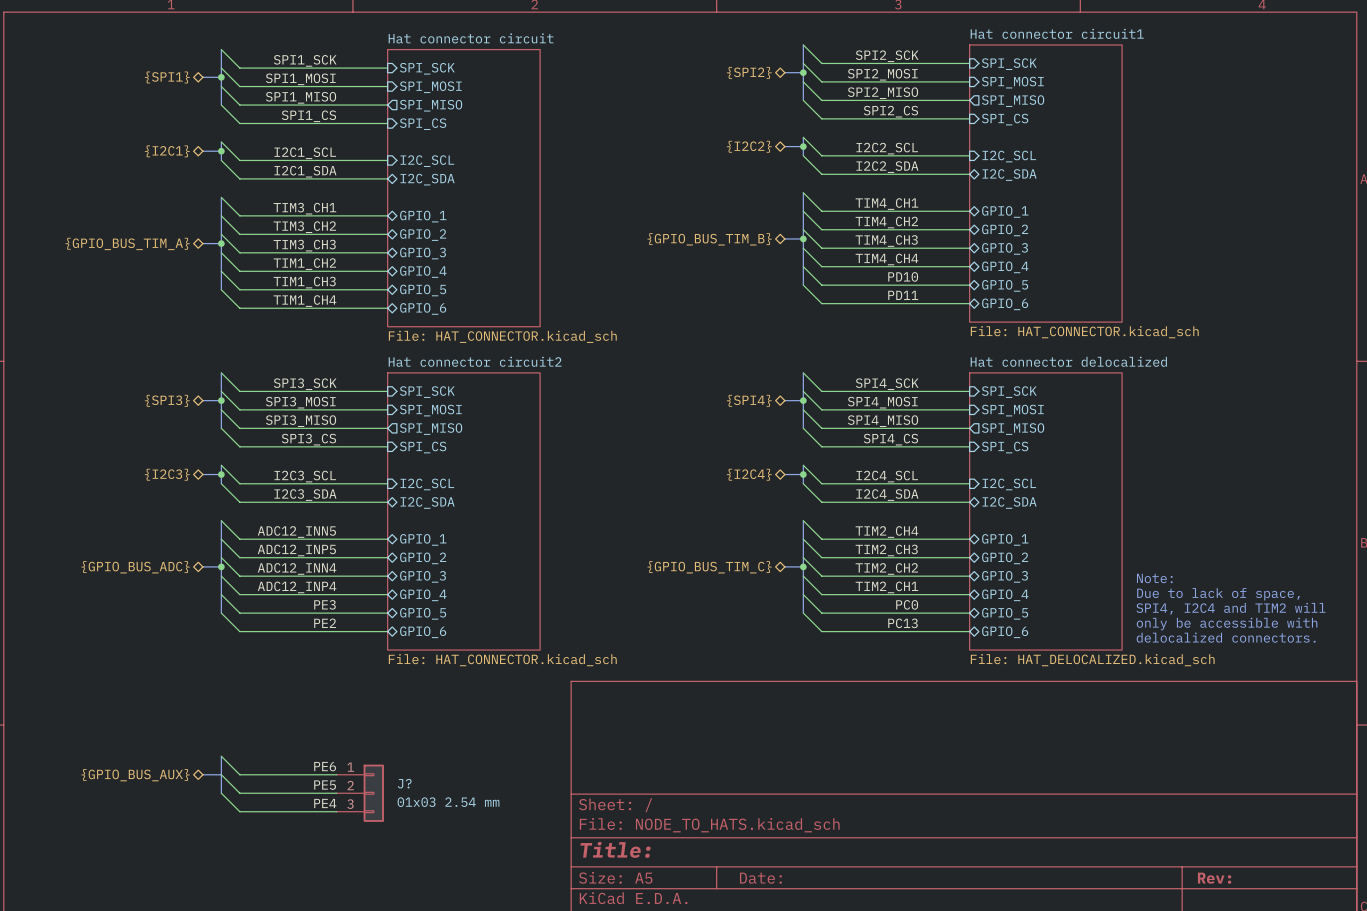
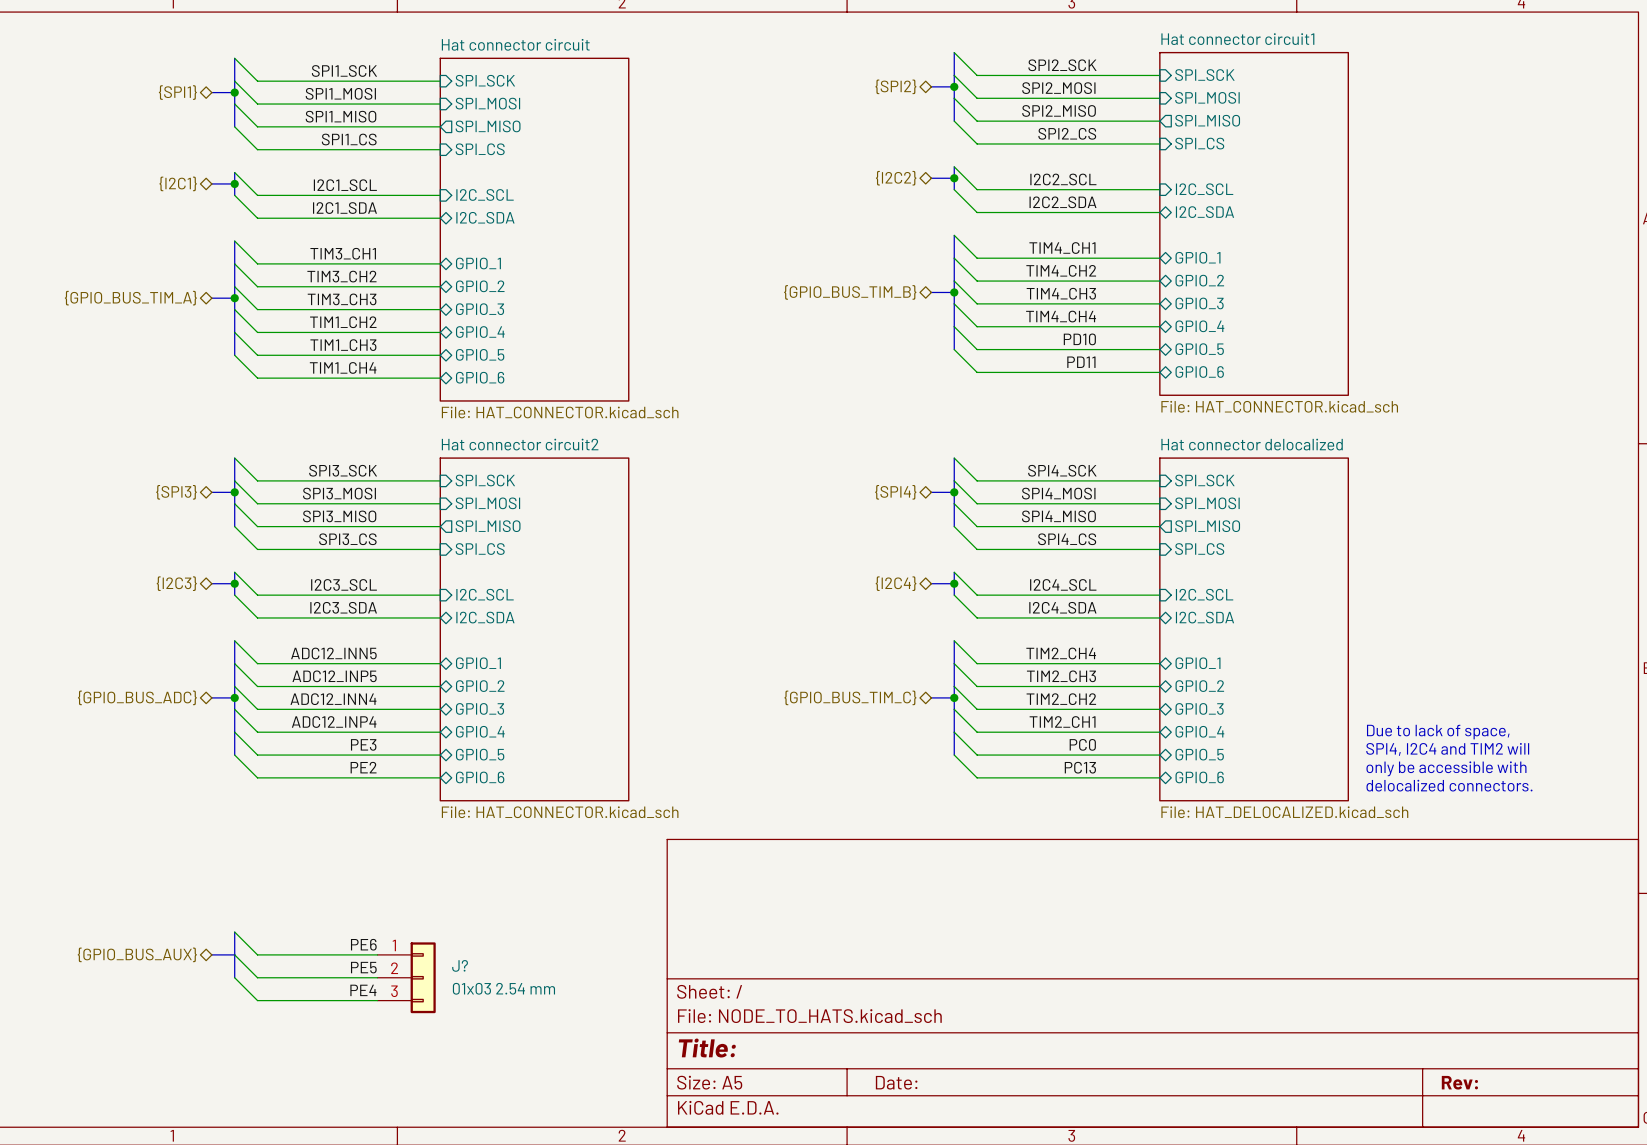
text: Note: (1154, 578) -> none

